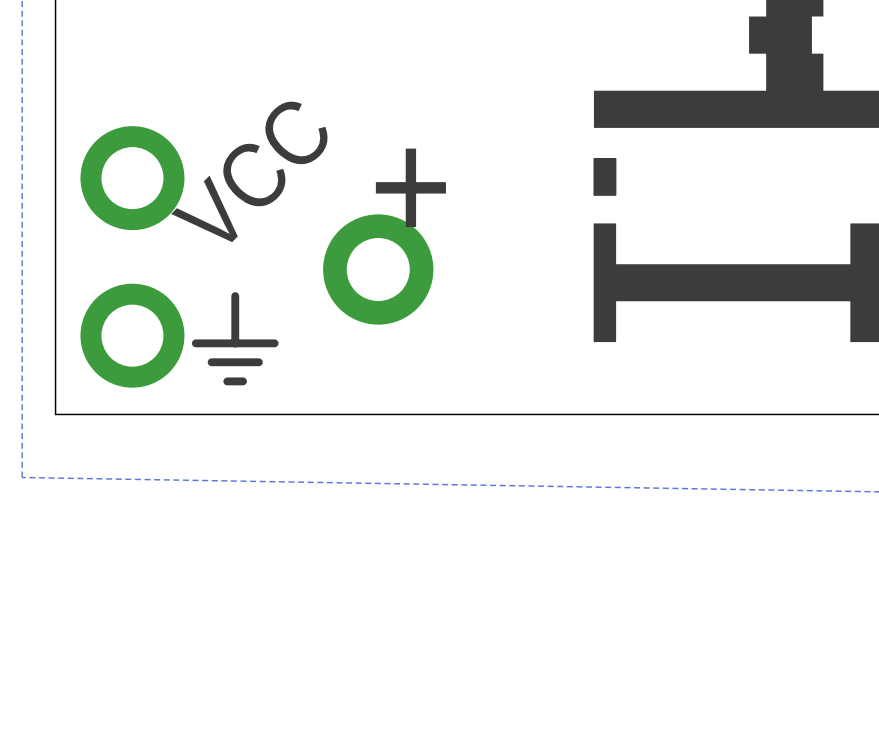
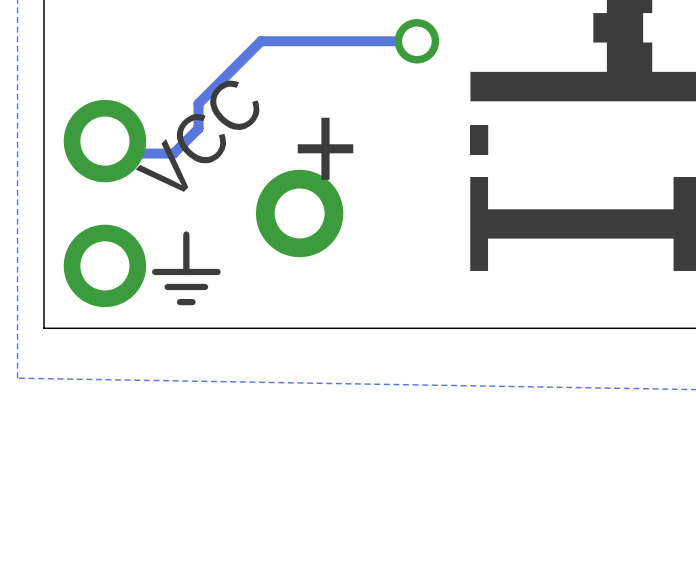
track: none -> (416, 41) (260, 41) (198, 103) (198, 128) (173, 153) (117, 153) (104, 141)
via: none -> (416, 41)

